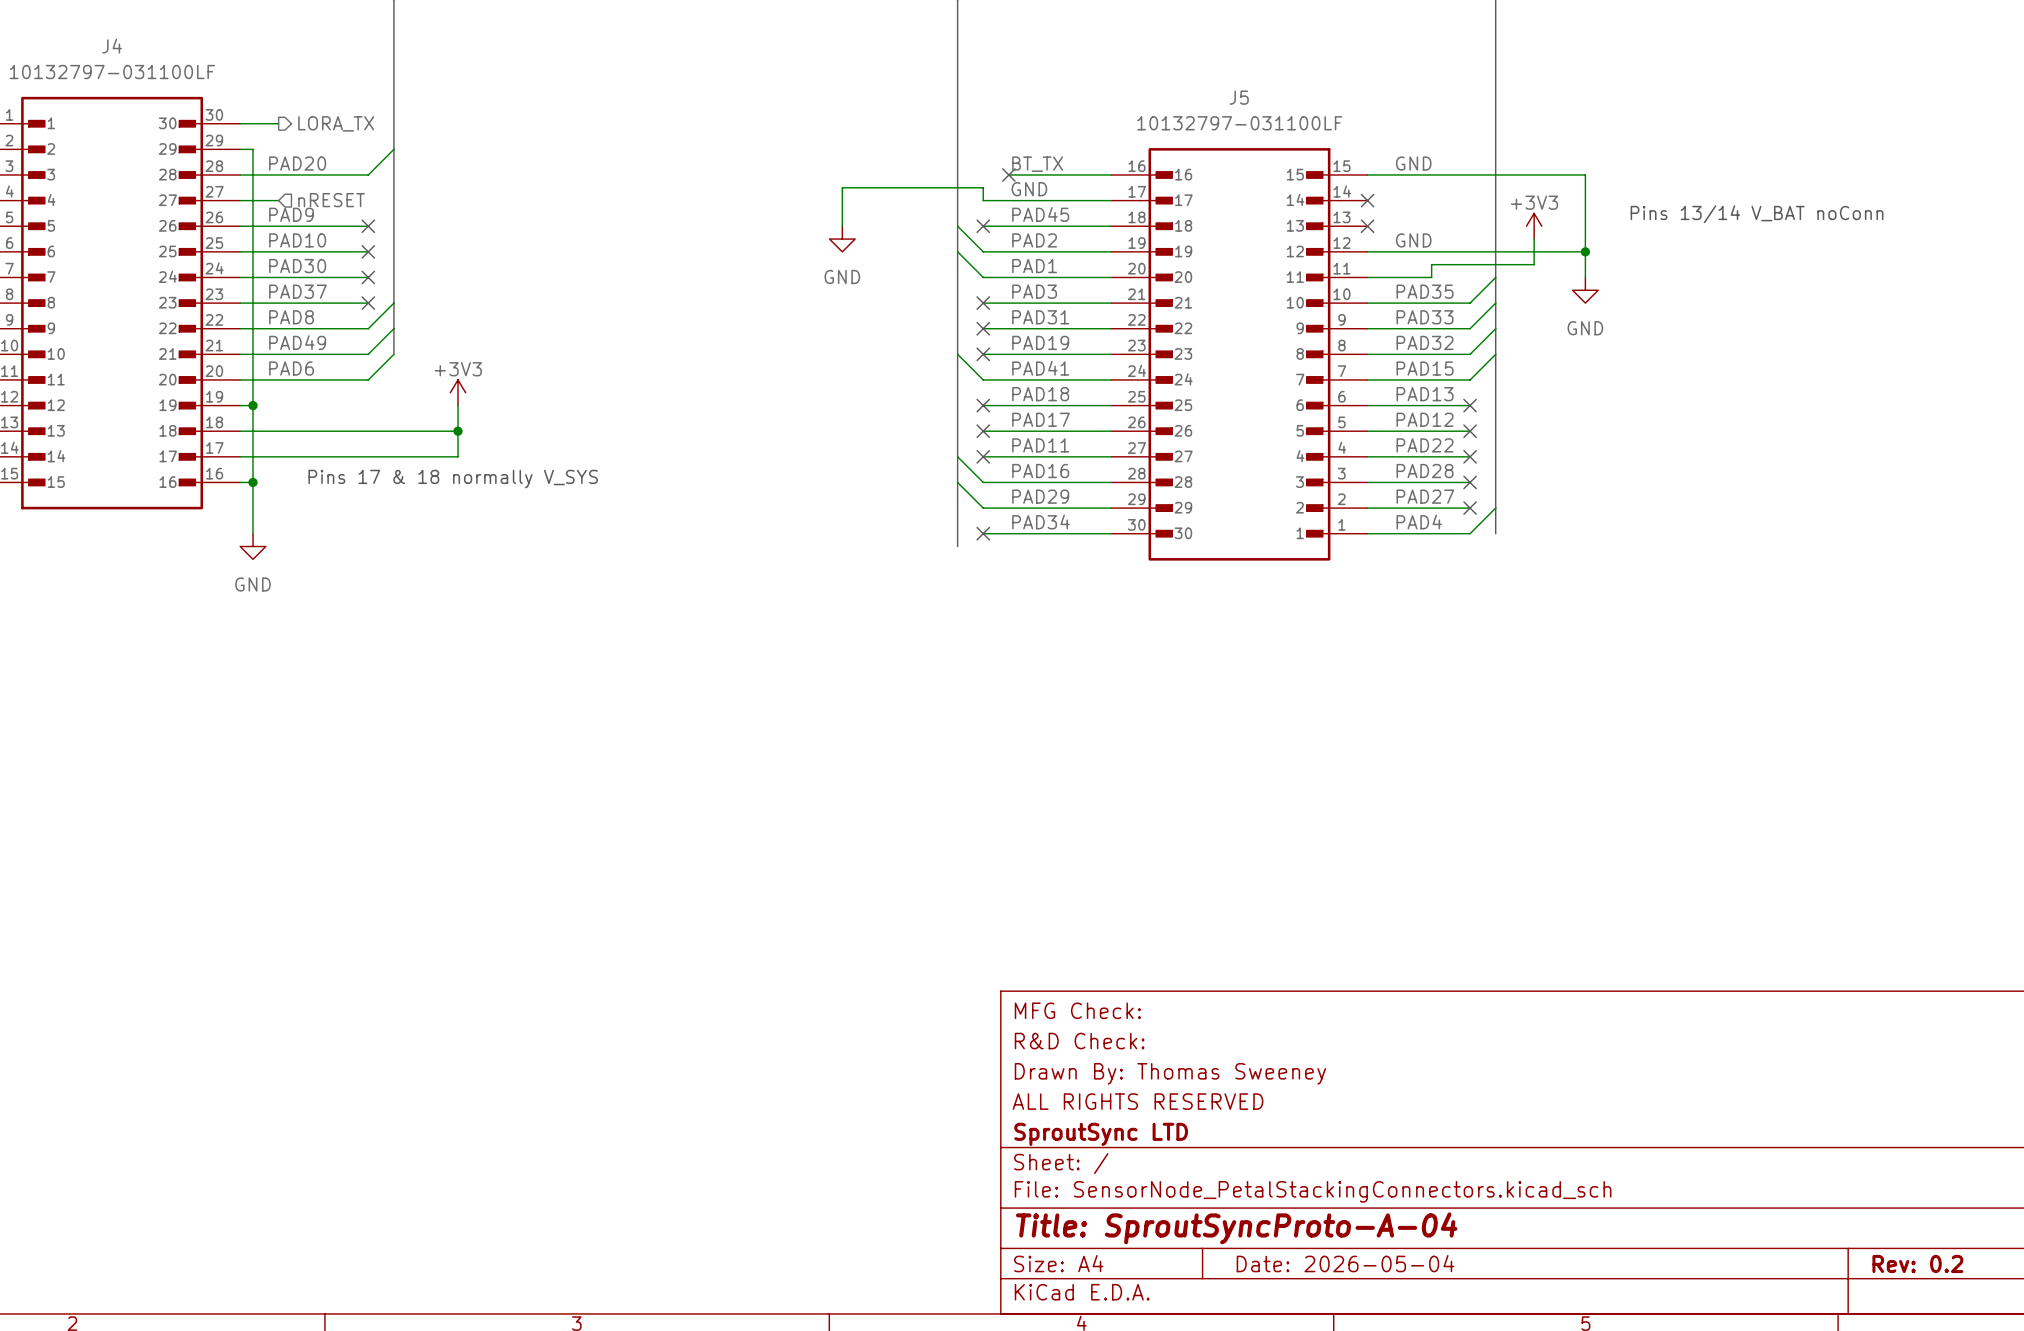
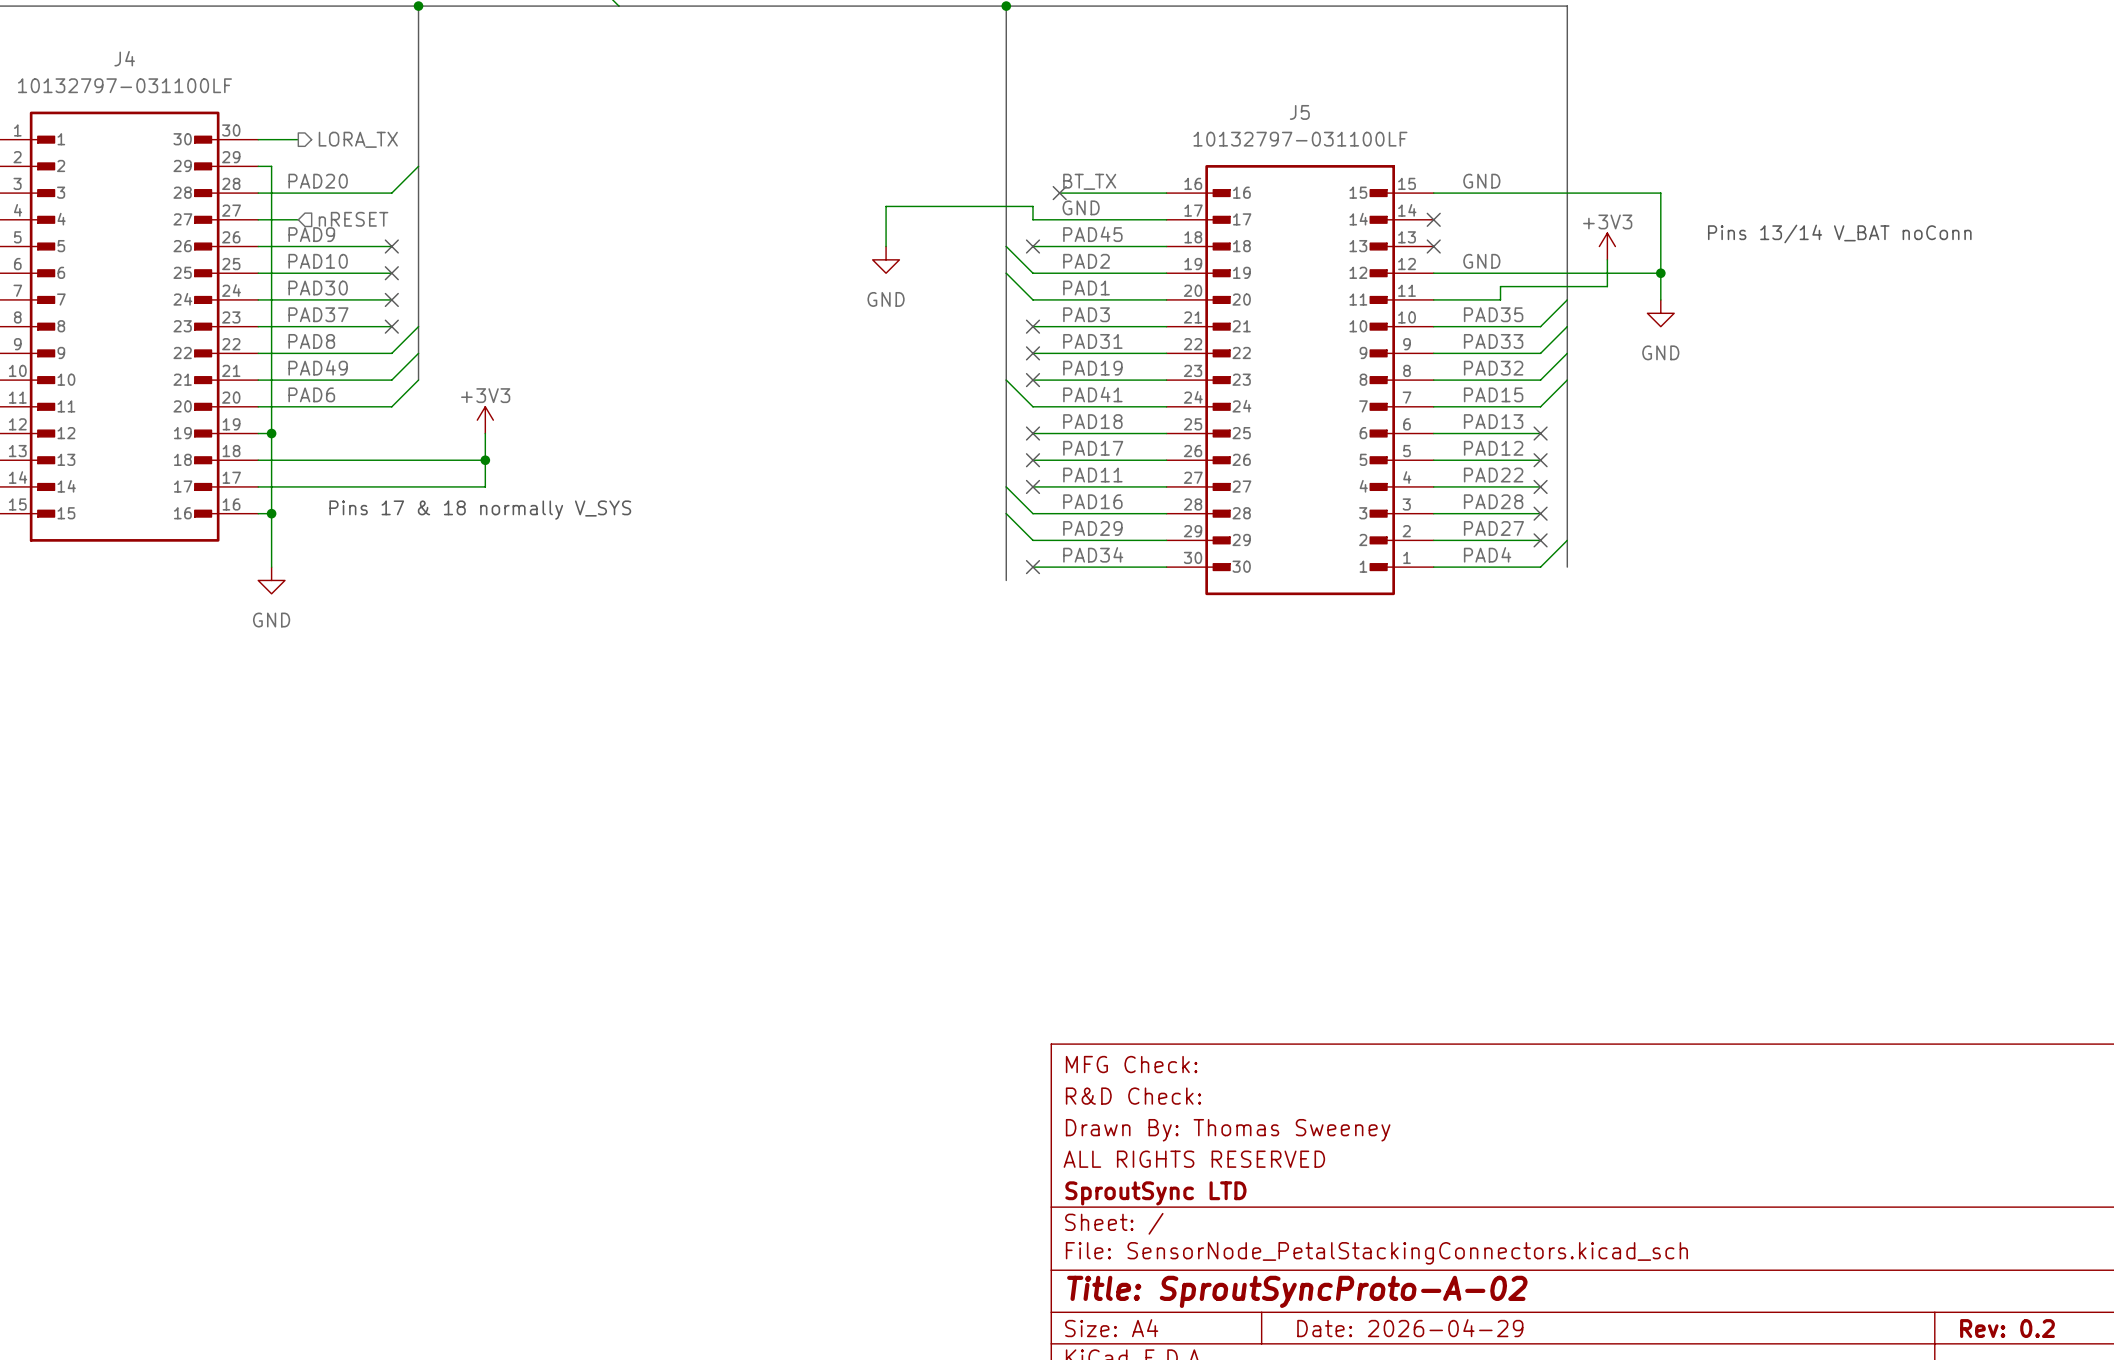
title block: Title: SproutSyncProto-A-04 (1236, 1228) -> Title: SproutSyncProto-A-02 (1297, 1291)
title block: Date: 2026-05-04 (1345, 1263) -> Date: 2026-04-29 (1410, 1328)

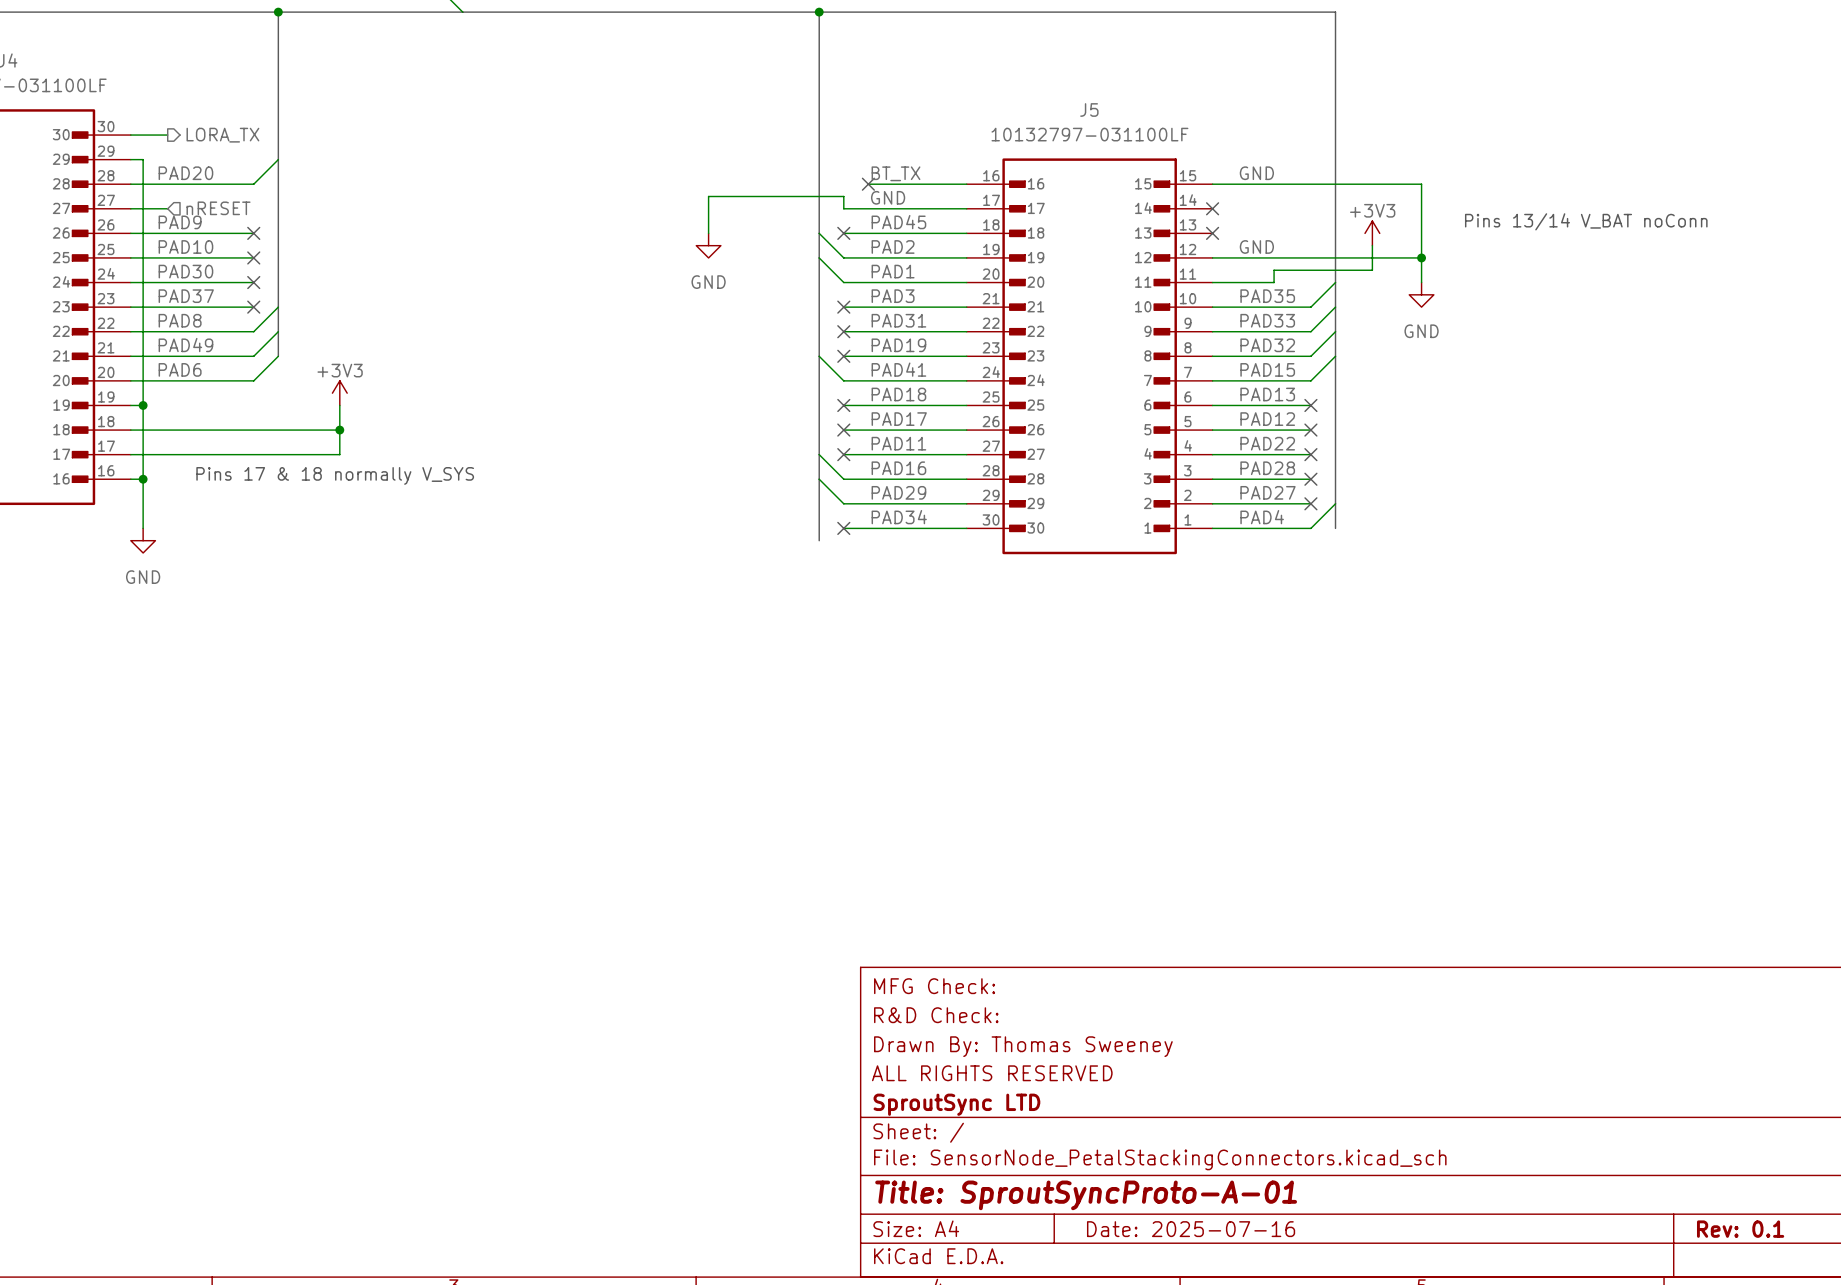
title block: Title: SproutSyncProto-A-02 (1297, 1291) -> Title: SproutSyncProto-A-01 (1086, 1195)
title block: Date: 2026-04-29 (1410, 1328) -> Date: 2025-07-16 (1191, 1229)
title block: Rev: 0.2 (2007, 1328) -> Rev: 0.1 (1740, 1229)

